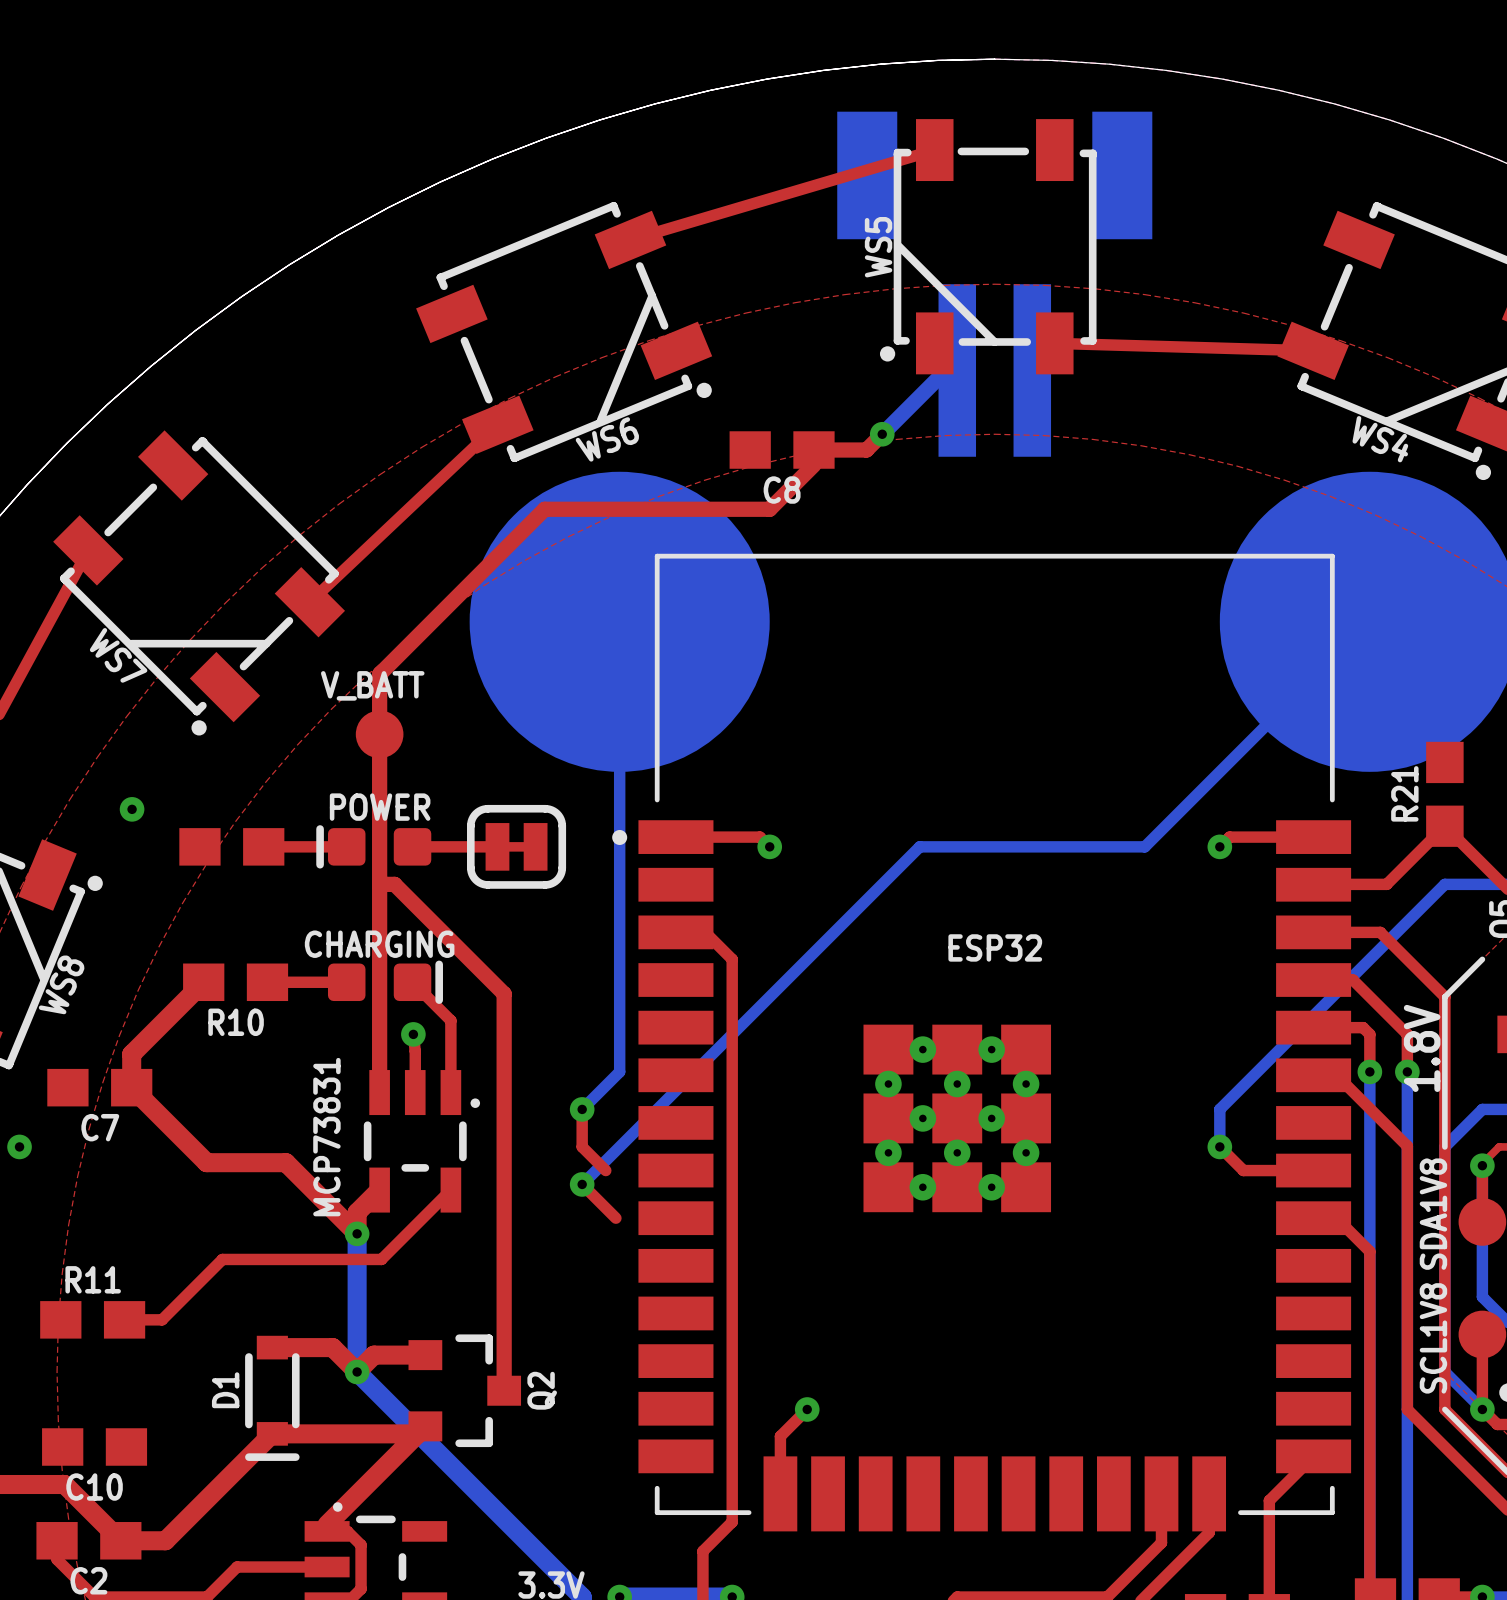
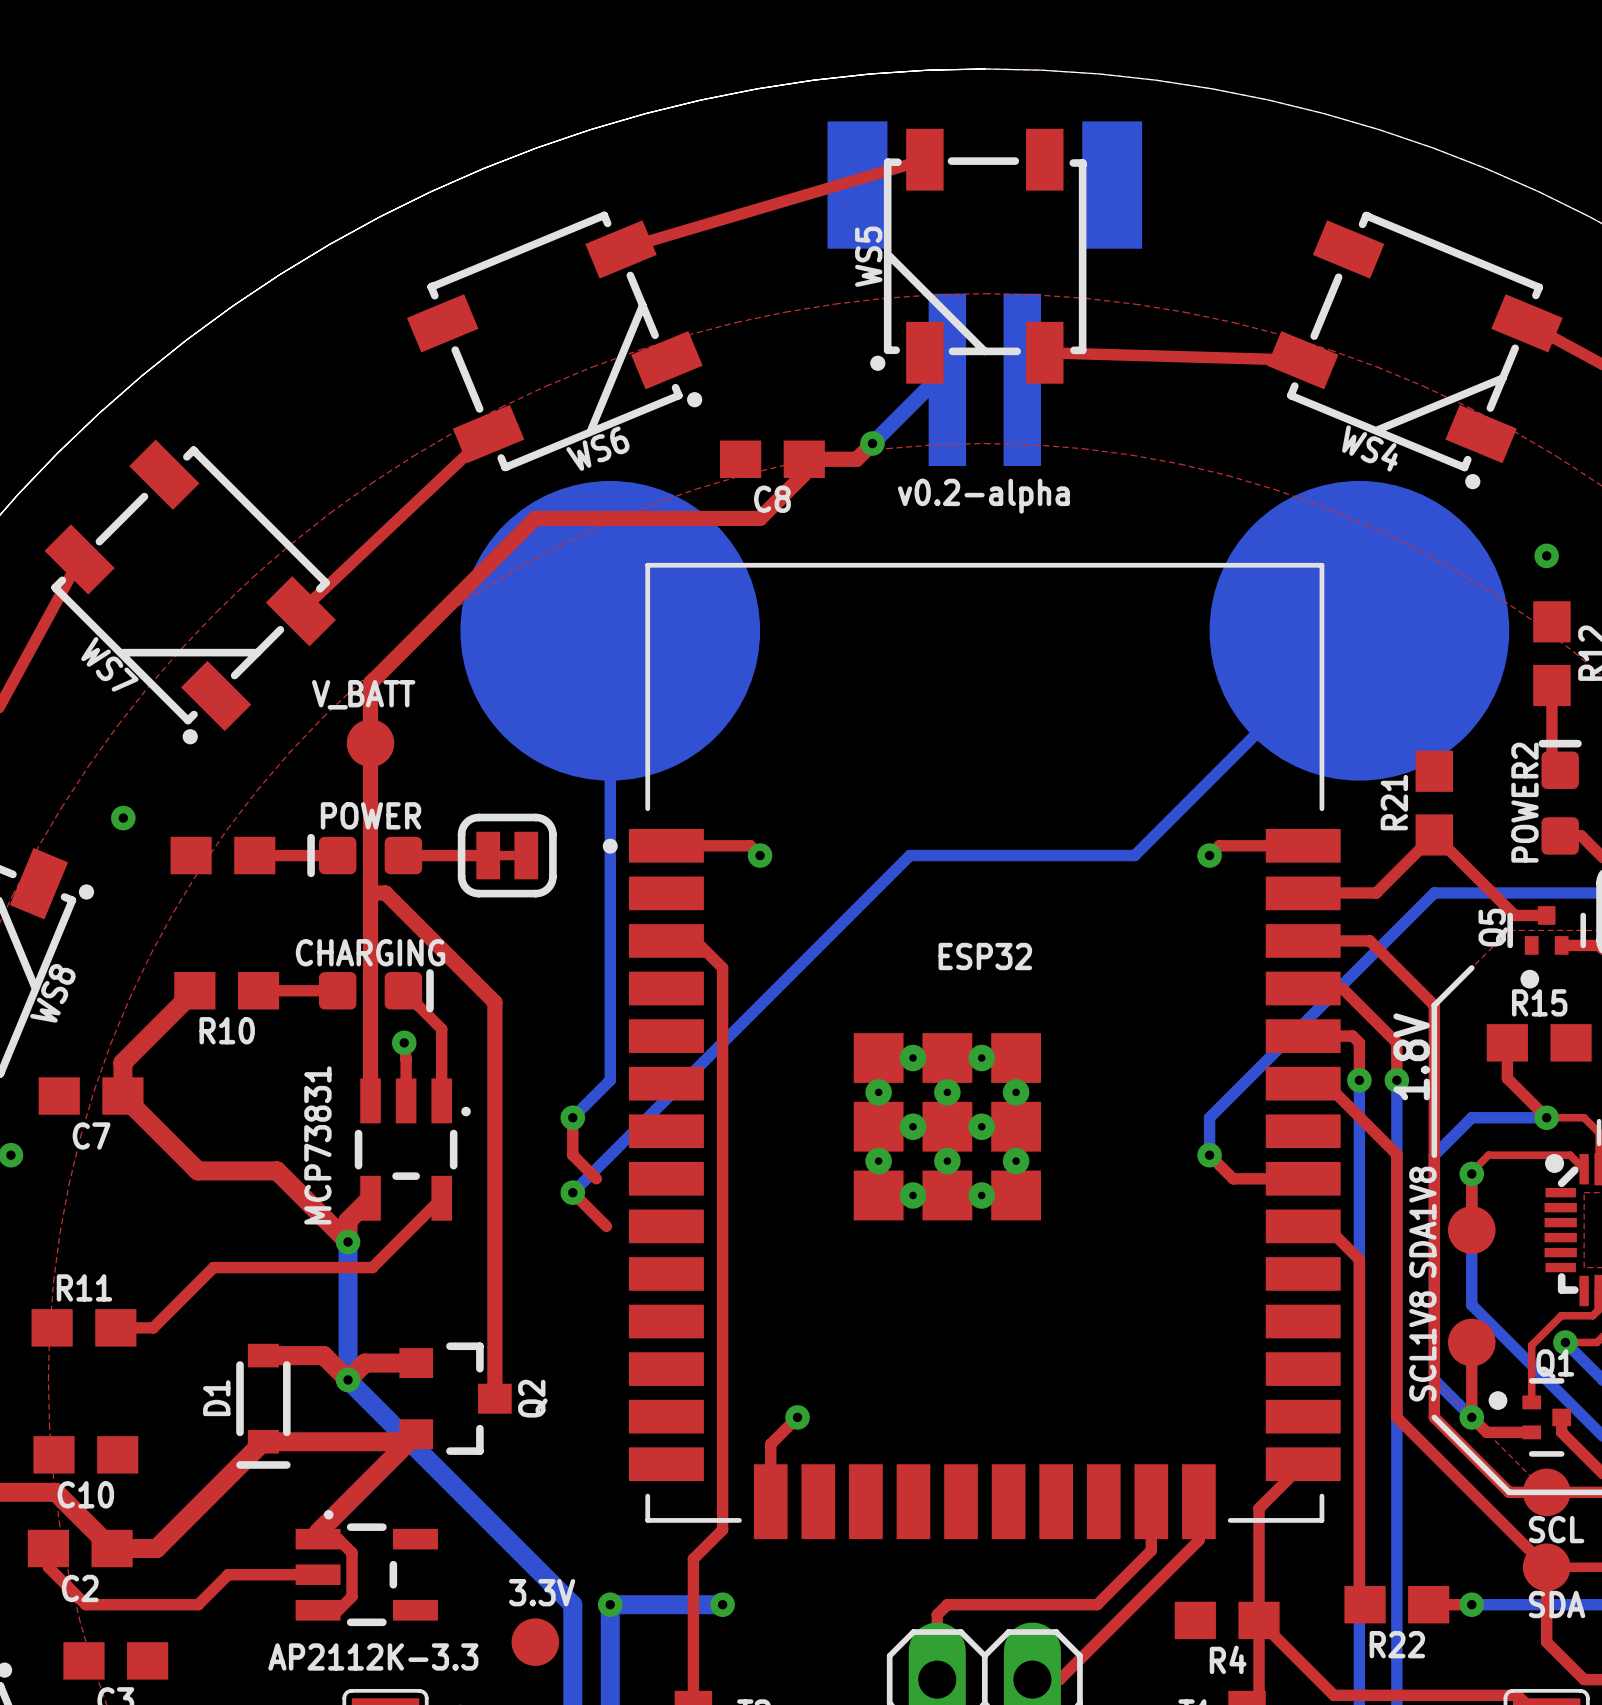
text: none -> v0.2-alpha (983, 496)

